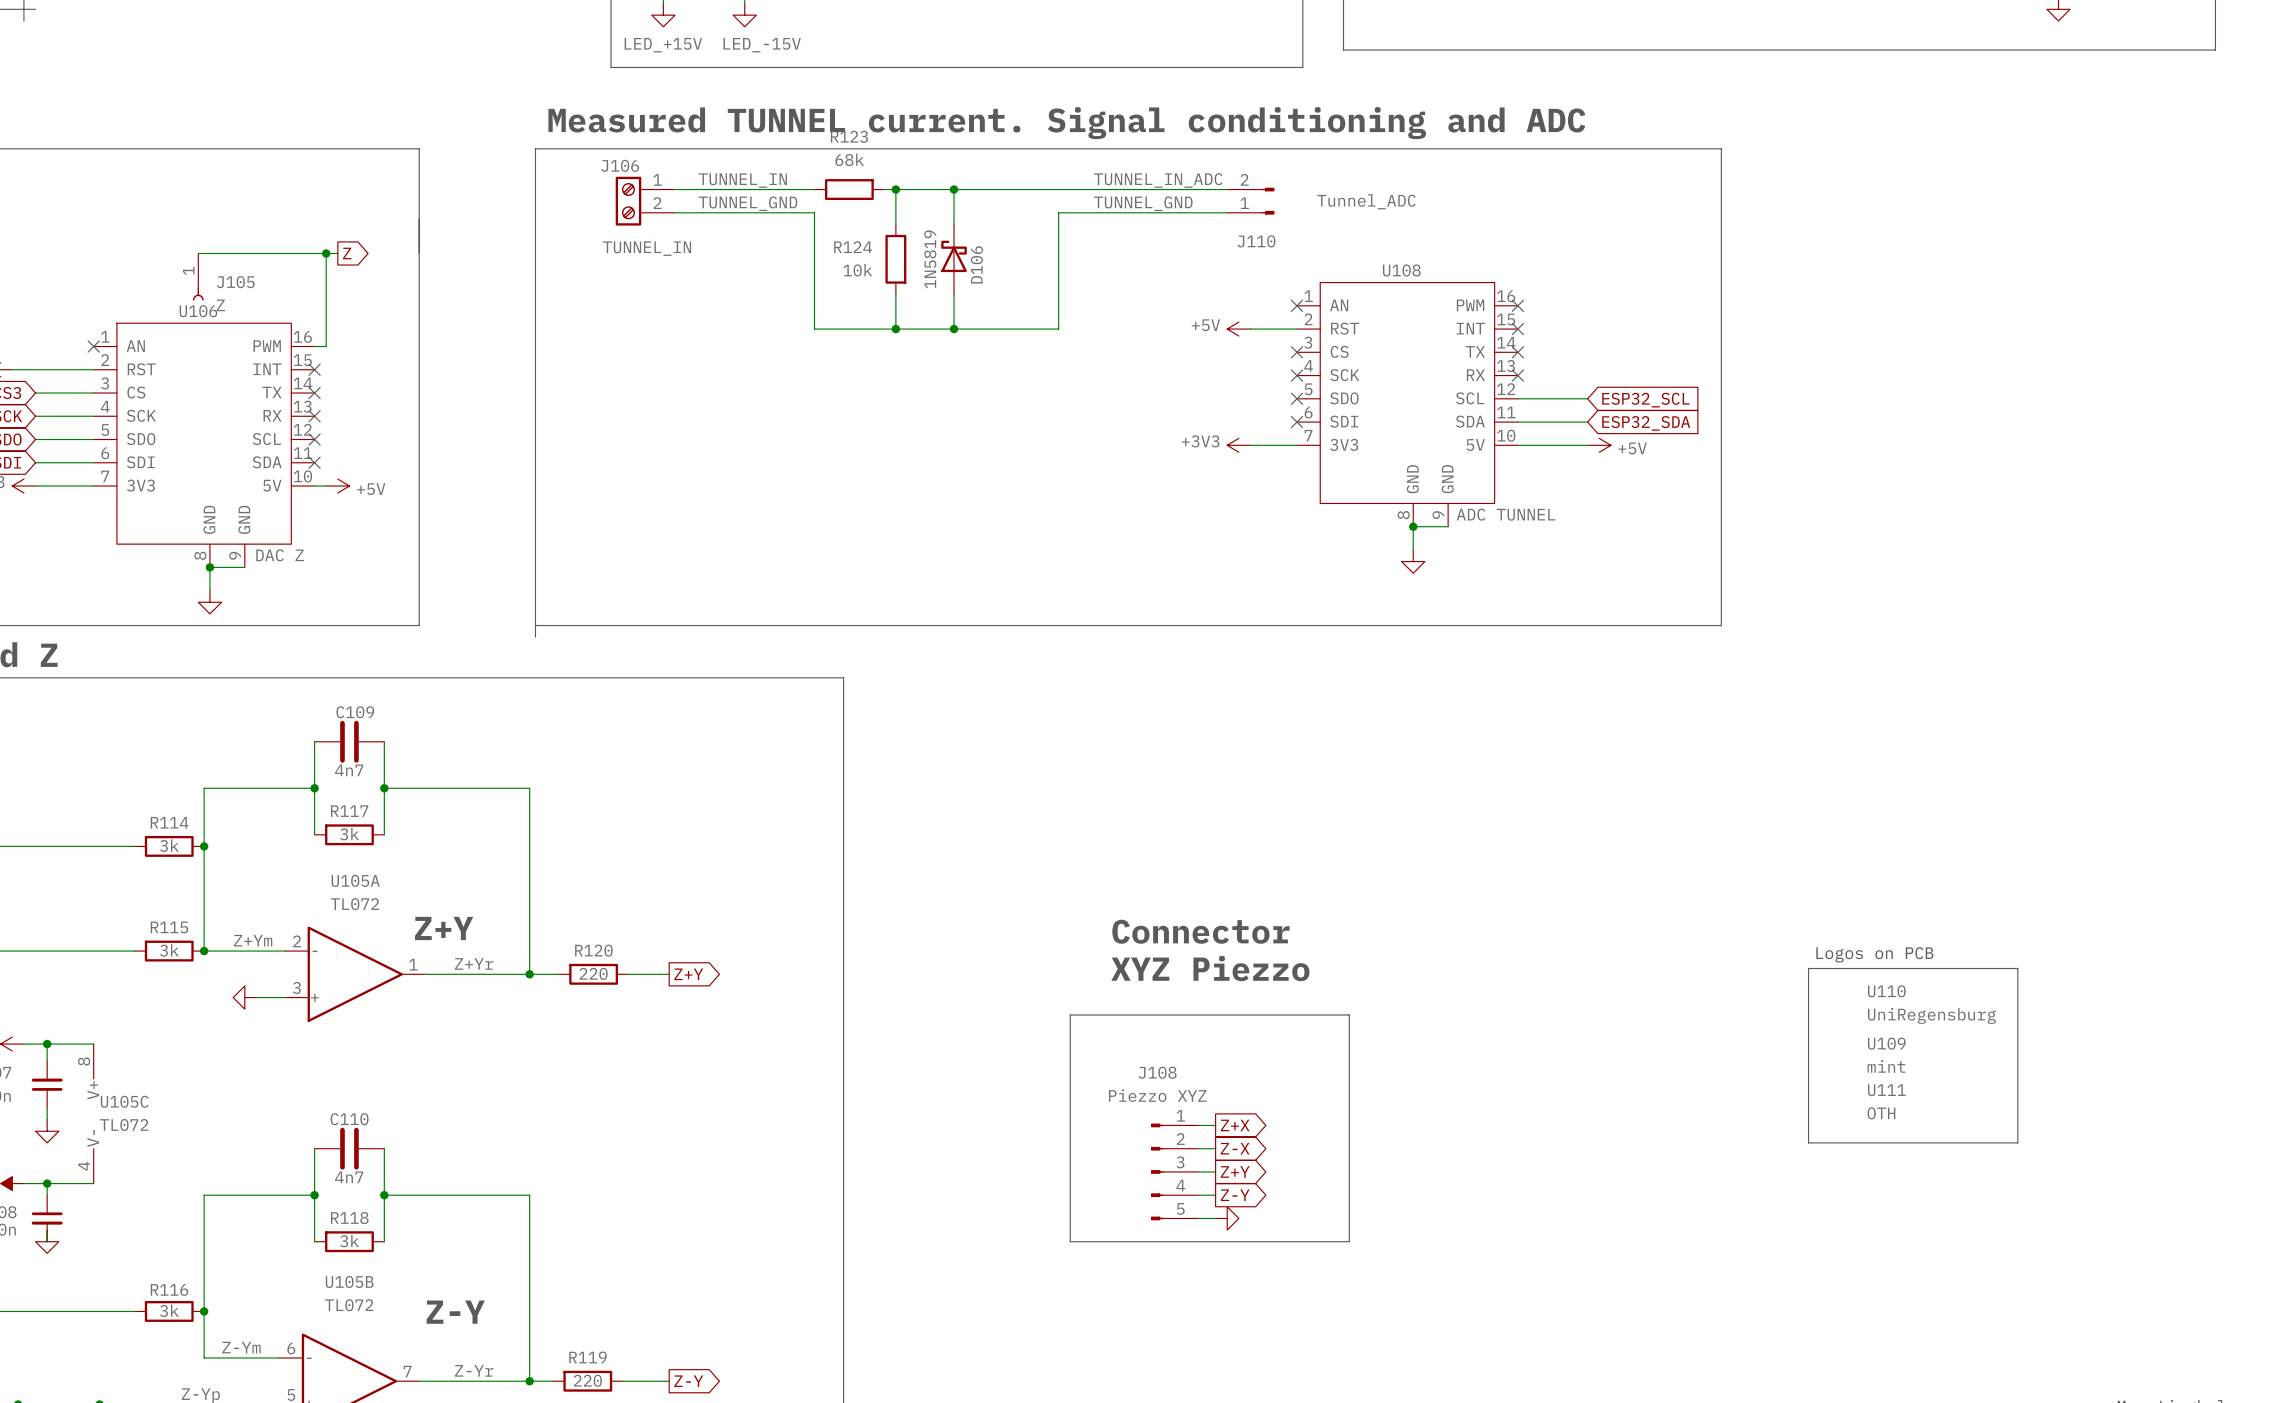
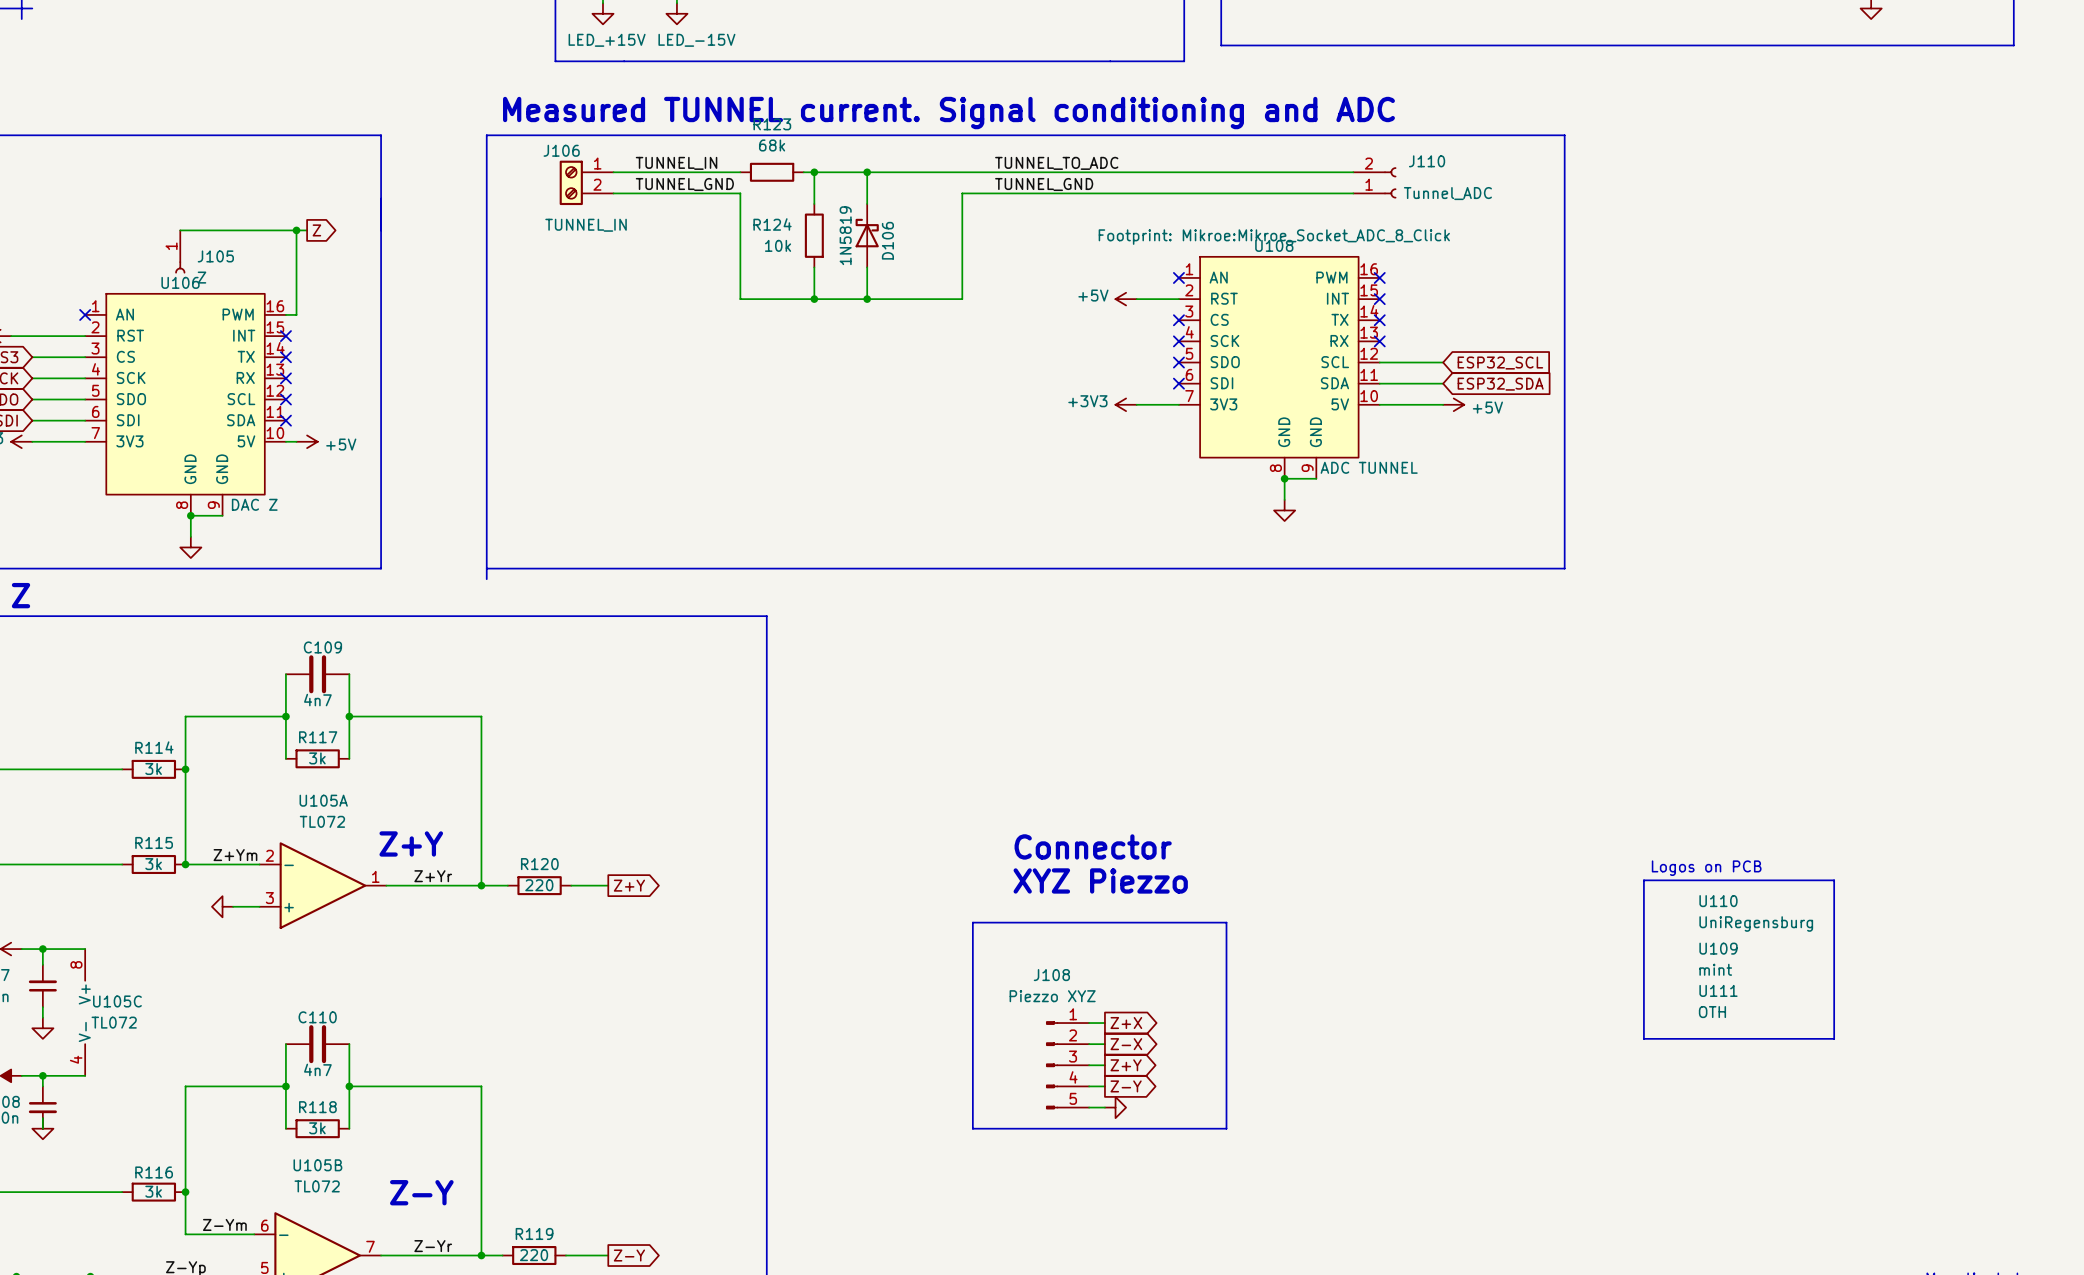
label: TUNNEL_IN_ADC (1158, 180) -> TUNNEL_TO_ADC (1056, 163)
J110 symbol: [1227, 187, 1275, 215] -> [1353, 167, 1397, 199]
wire: none -> (1115, 172) (1353, 172)
J110 value position: Tunnel_ADC (1366, 201) -> Tunnel_ADC (1447, 193)
wire: none -> (1115, 193) (1353, 193)
J110 name position: J110 (1256, 241) -> J110 (1427, 161)
U108 text: none -> Footprint: Mikroe:Mikroe_Socket_ADC_8_Click (1274, 237)

